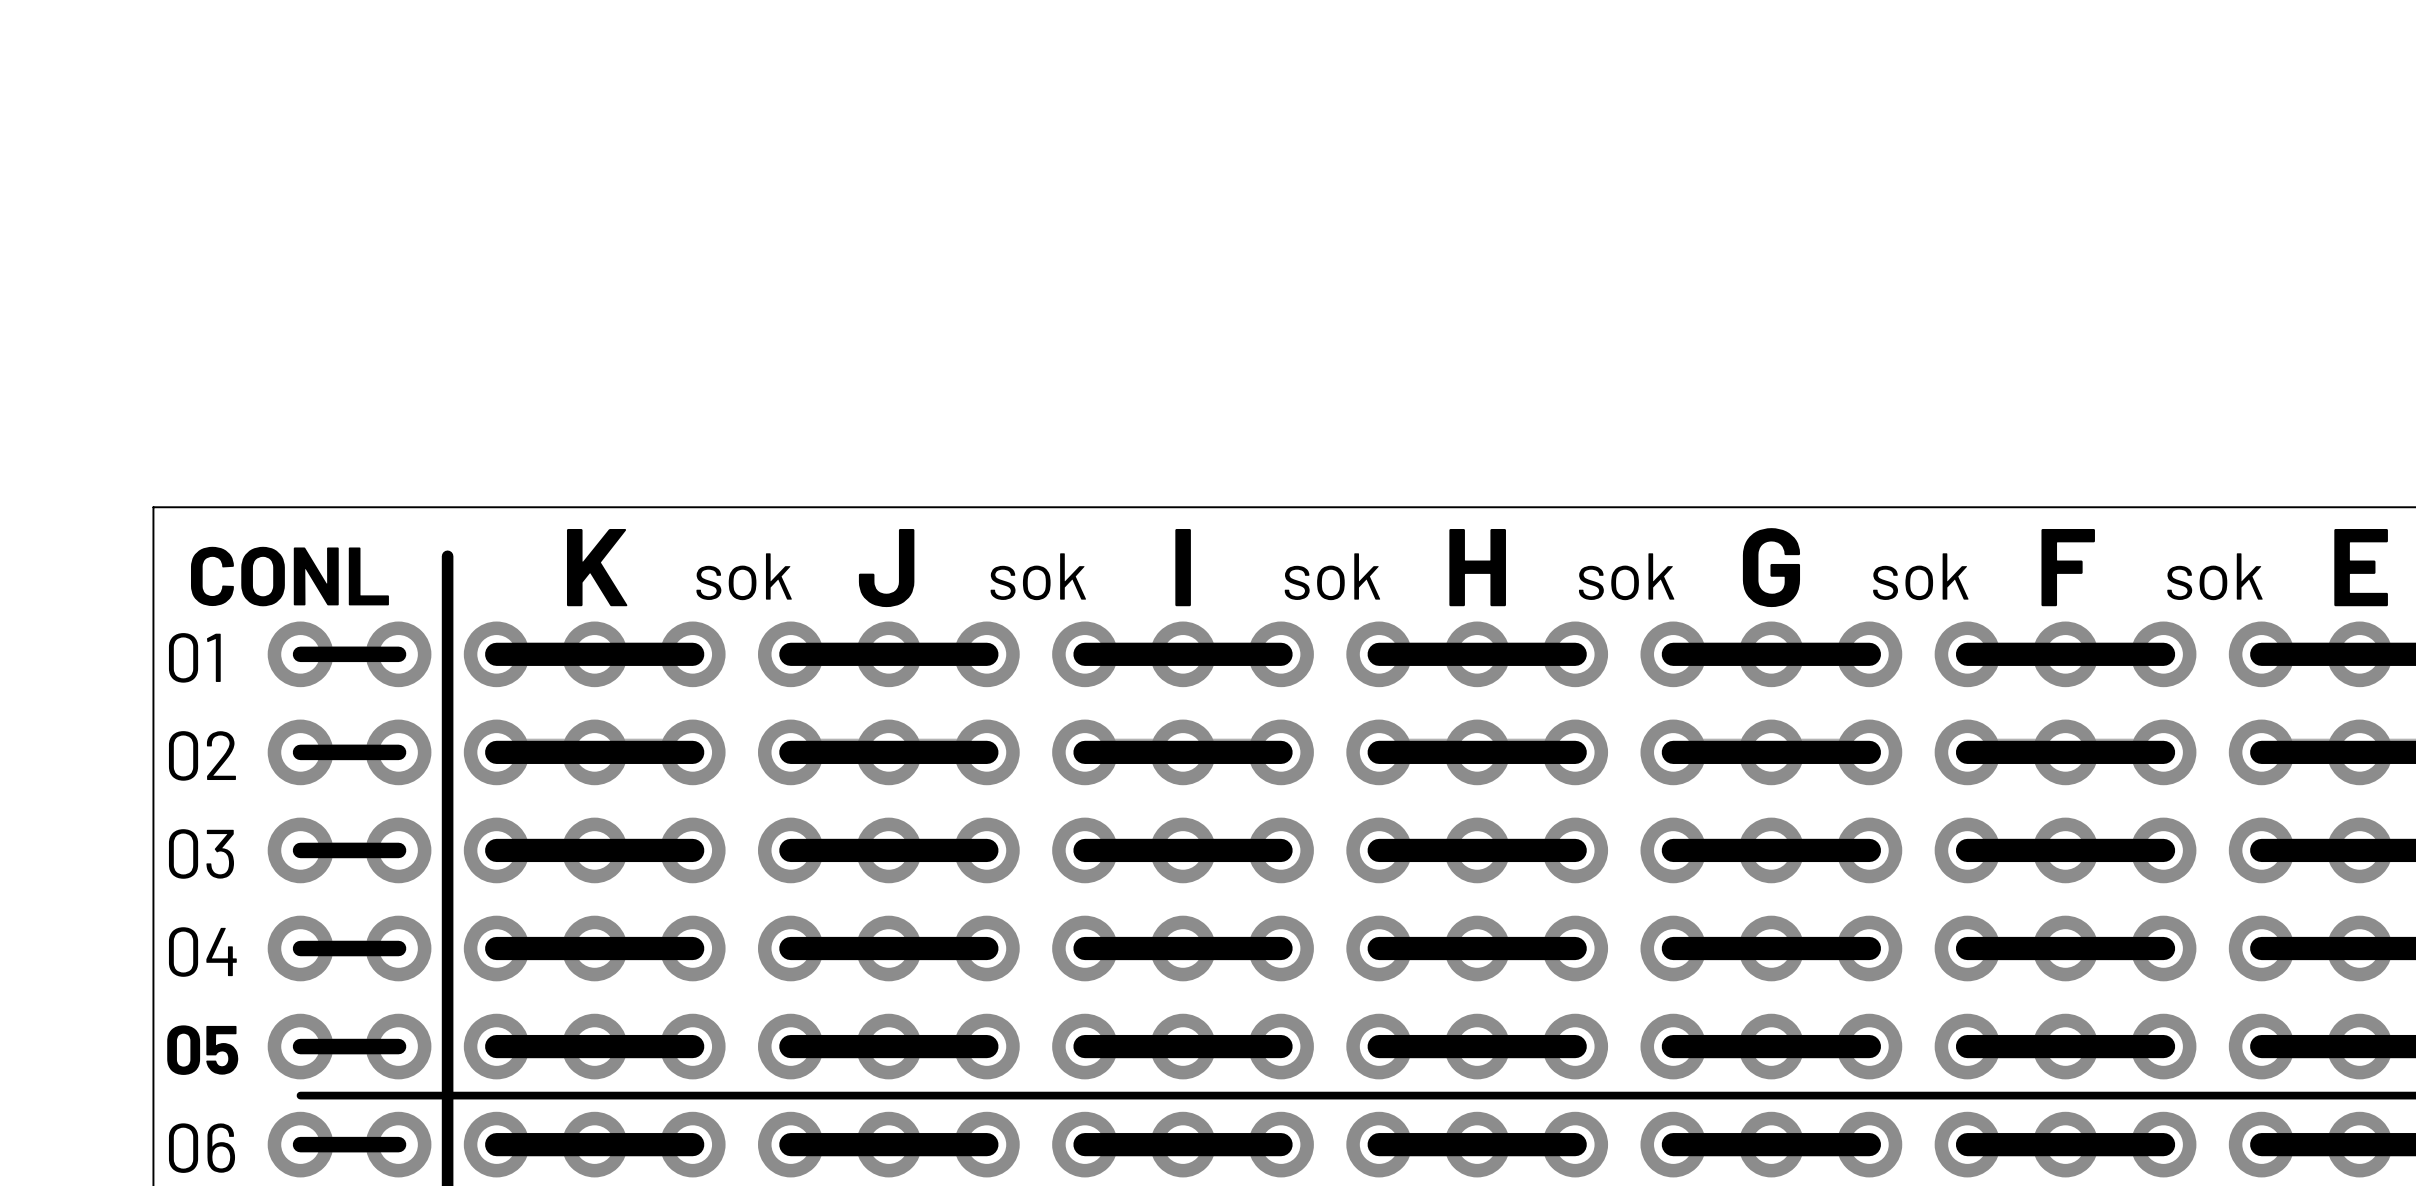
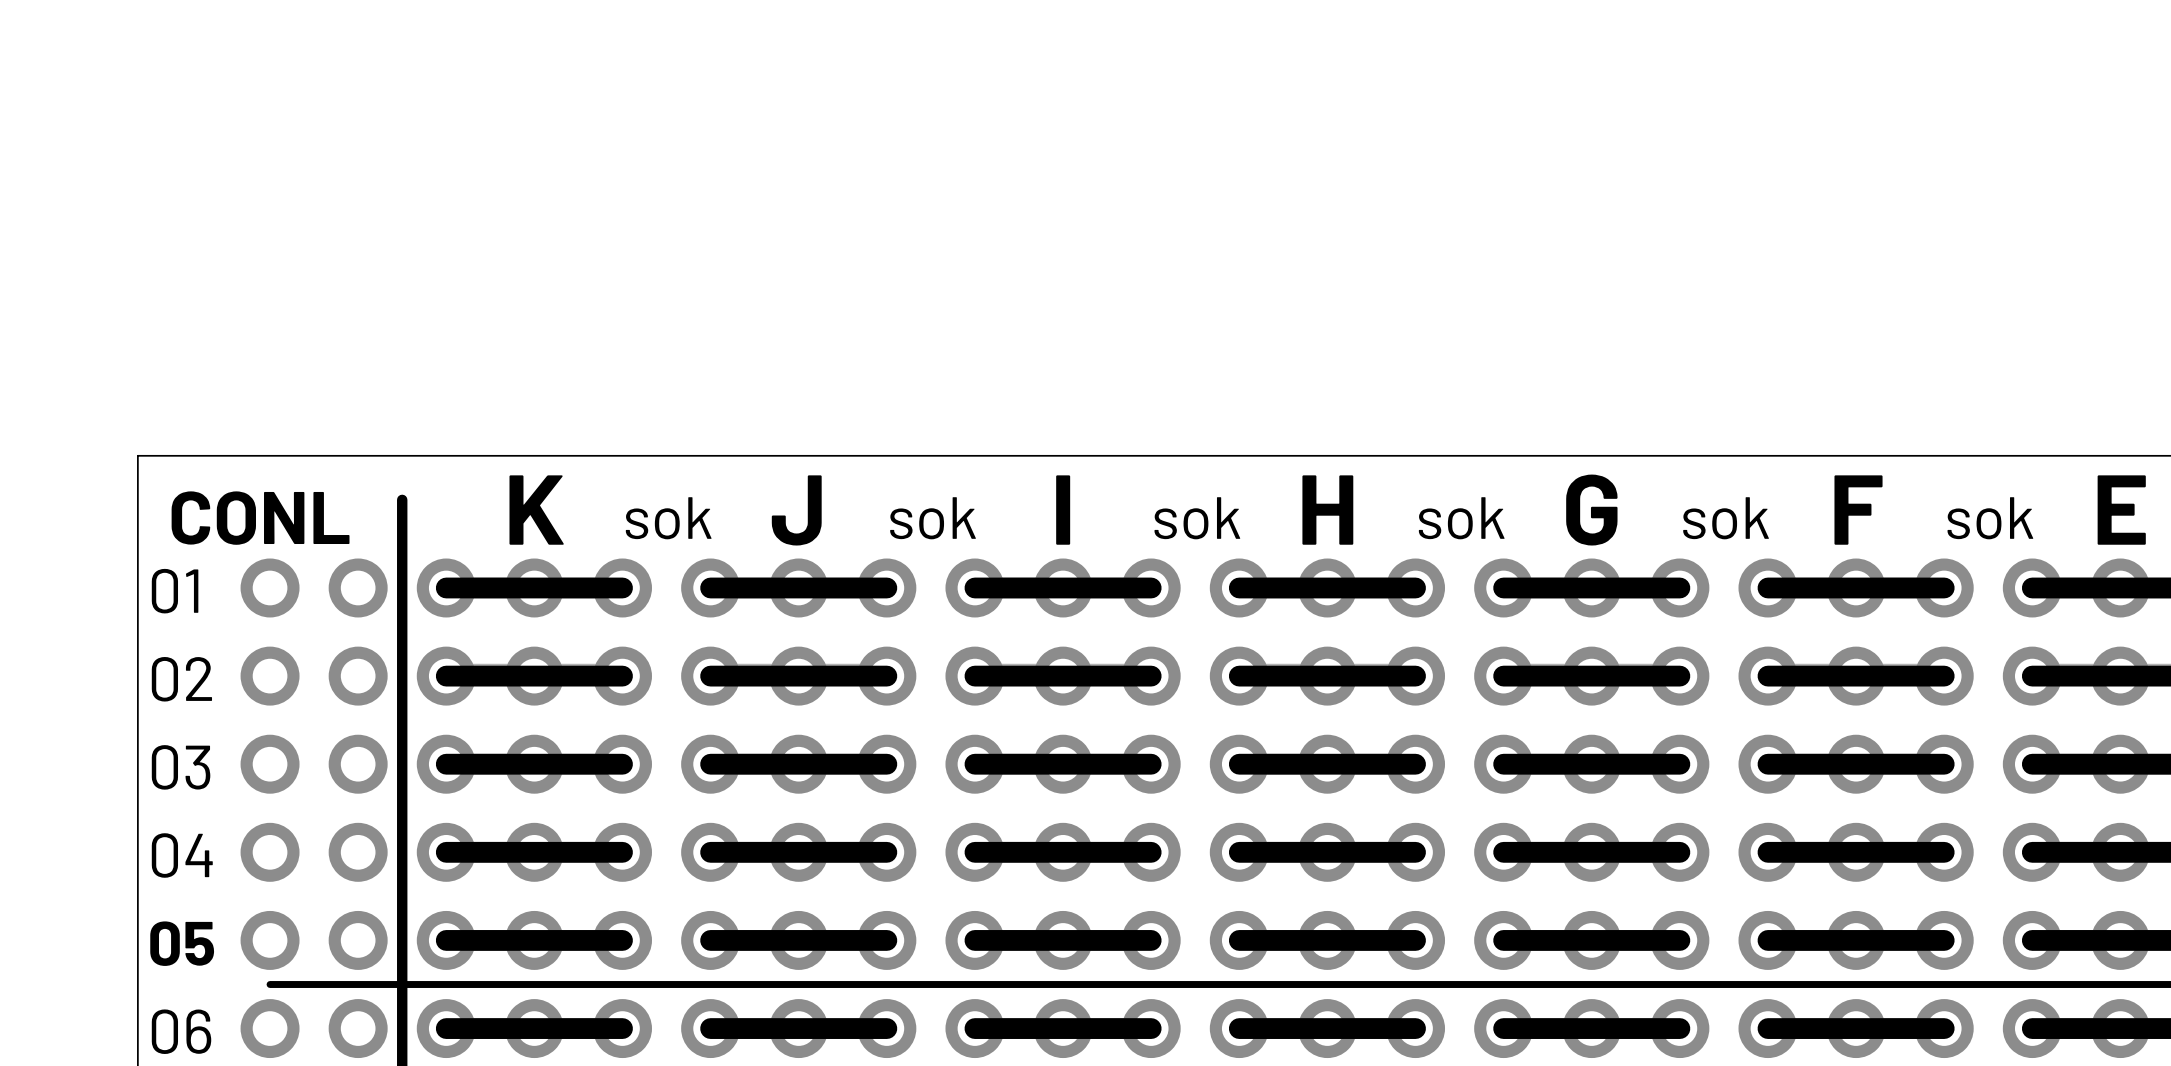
line: (398, 654) (300, 654) -> none
line: (398, 752) (300, 752) -> none
line: (398, 850) (300, 850) -> none
line: (398, 948) (300, 948) -> none
line: (398, 1046) (300, 1046) -> none
line: (398, 1144) (300, 1144) -> none

